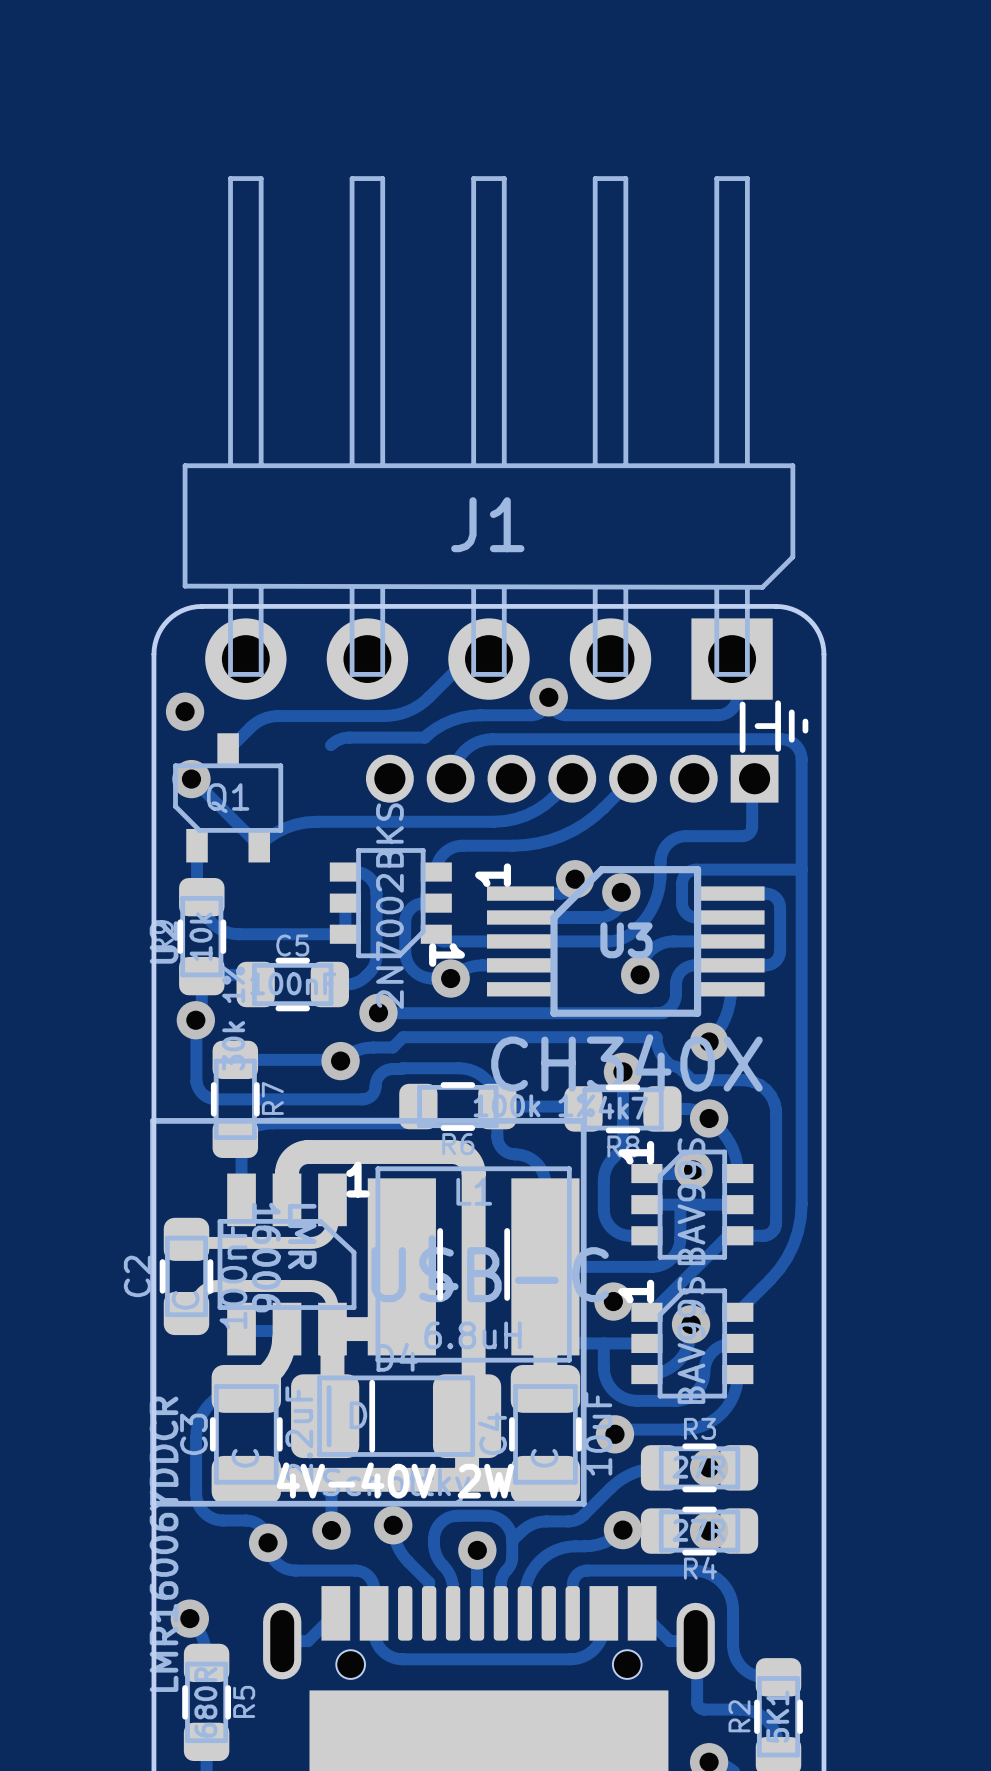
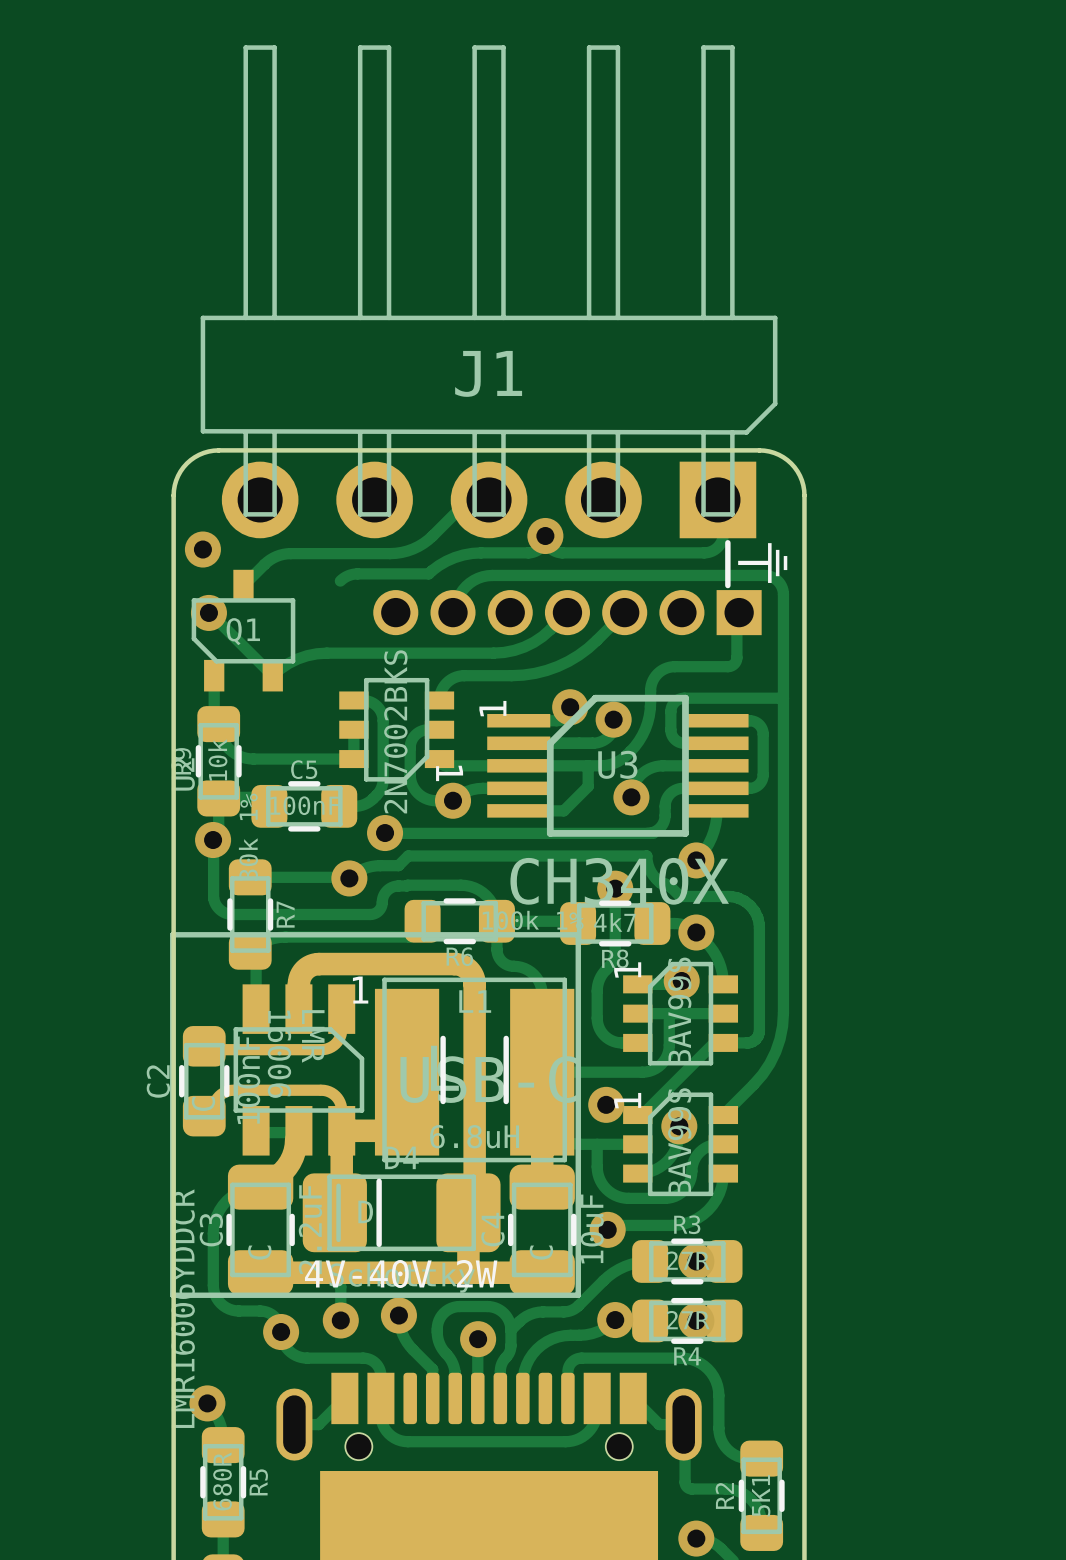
track: none -> (588, 765) (588, 786) (563, 810) (518, 810)

